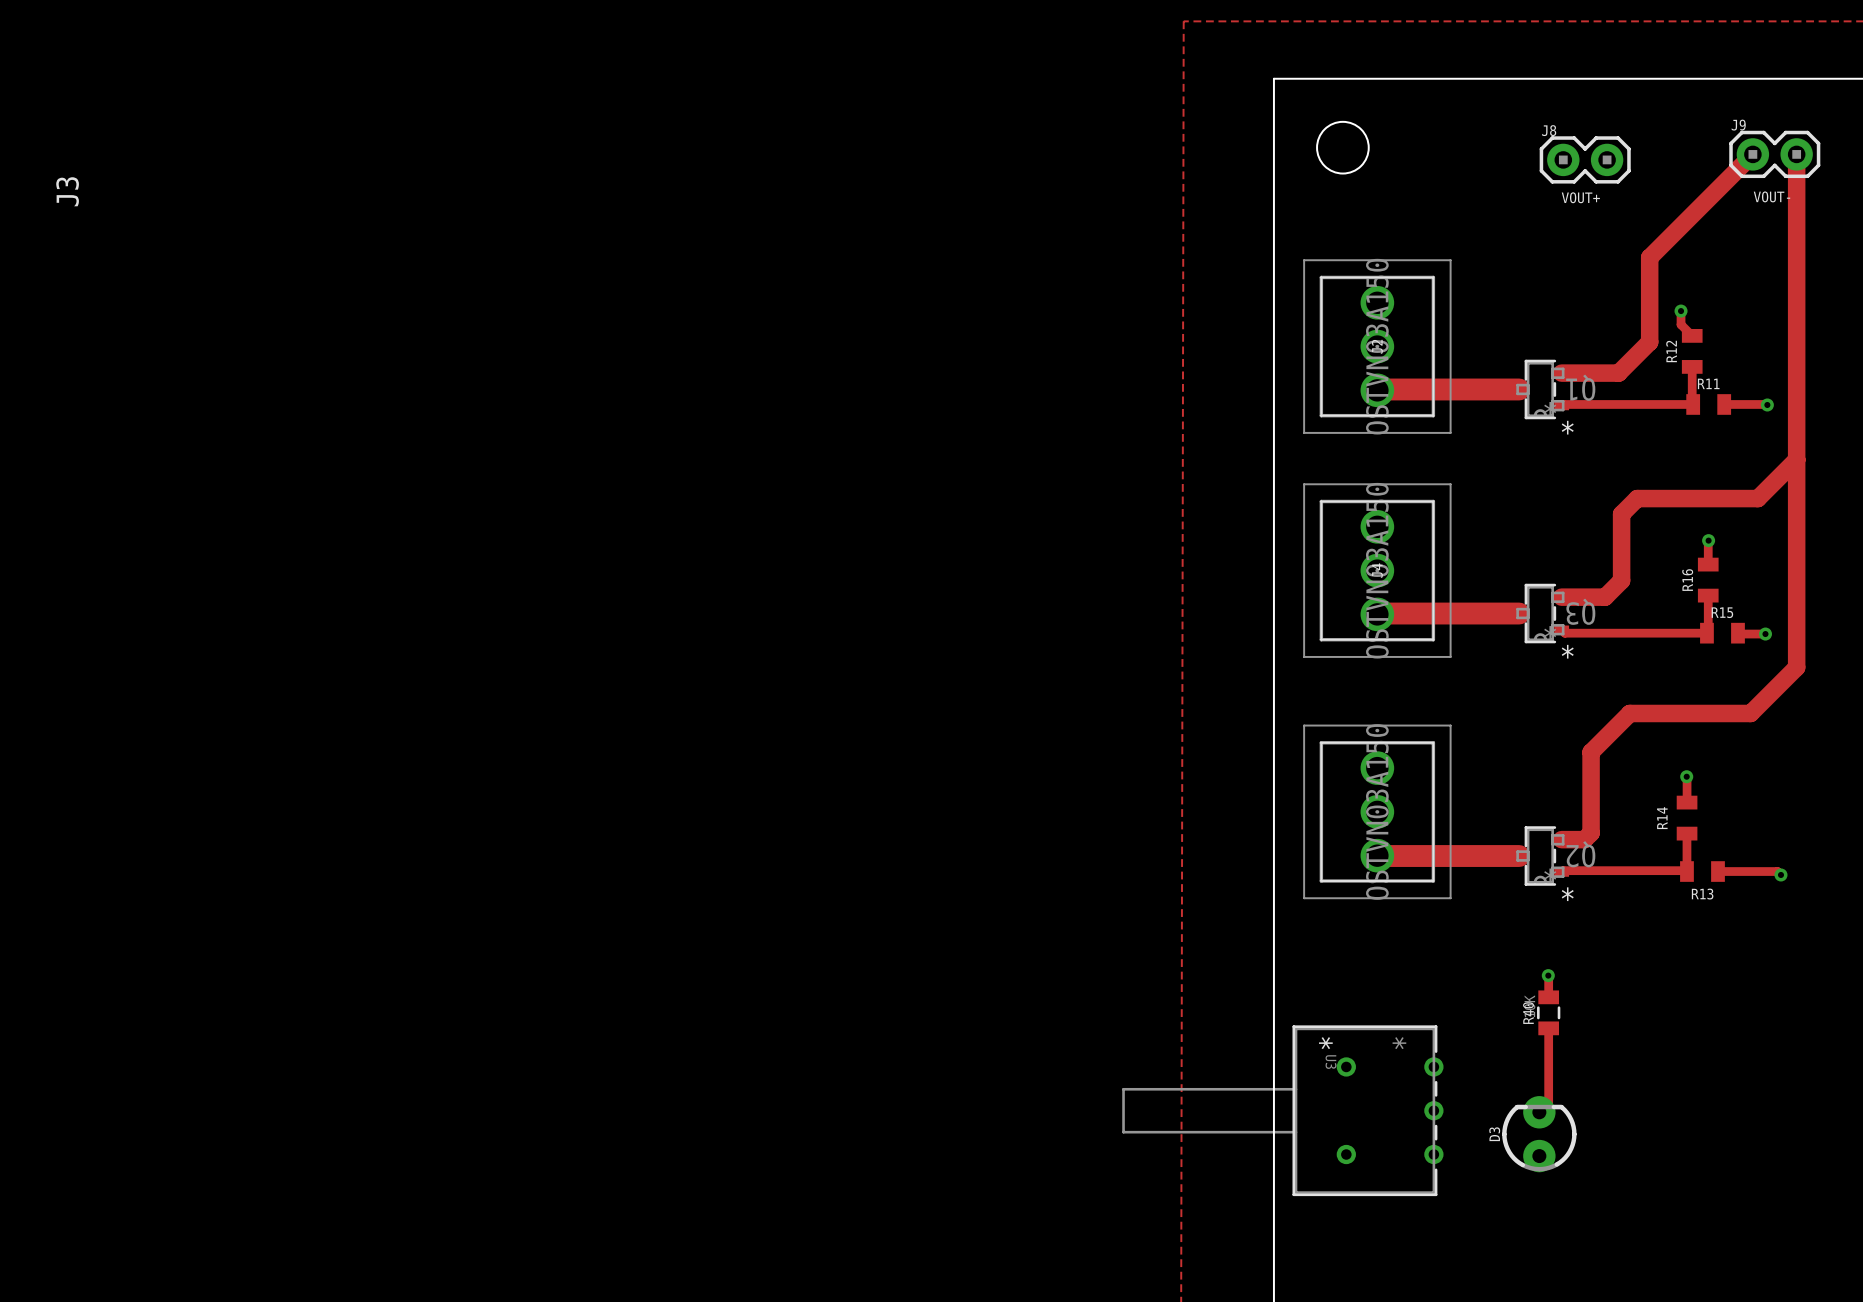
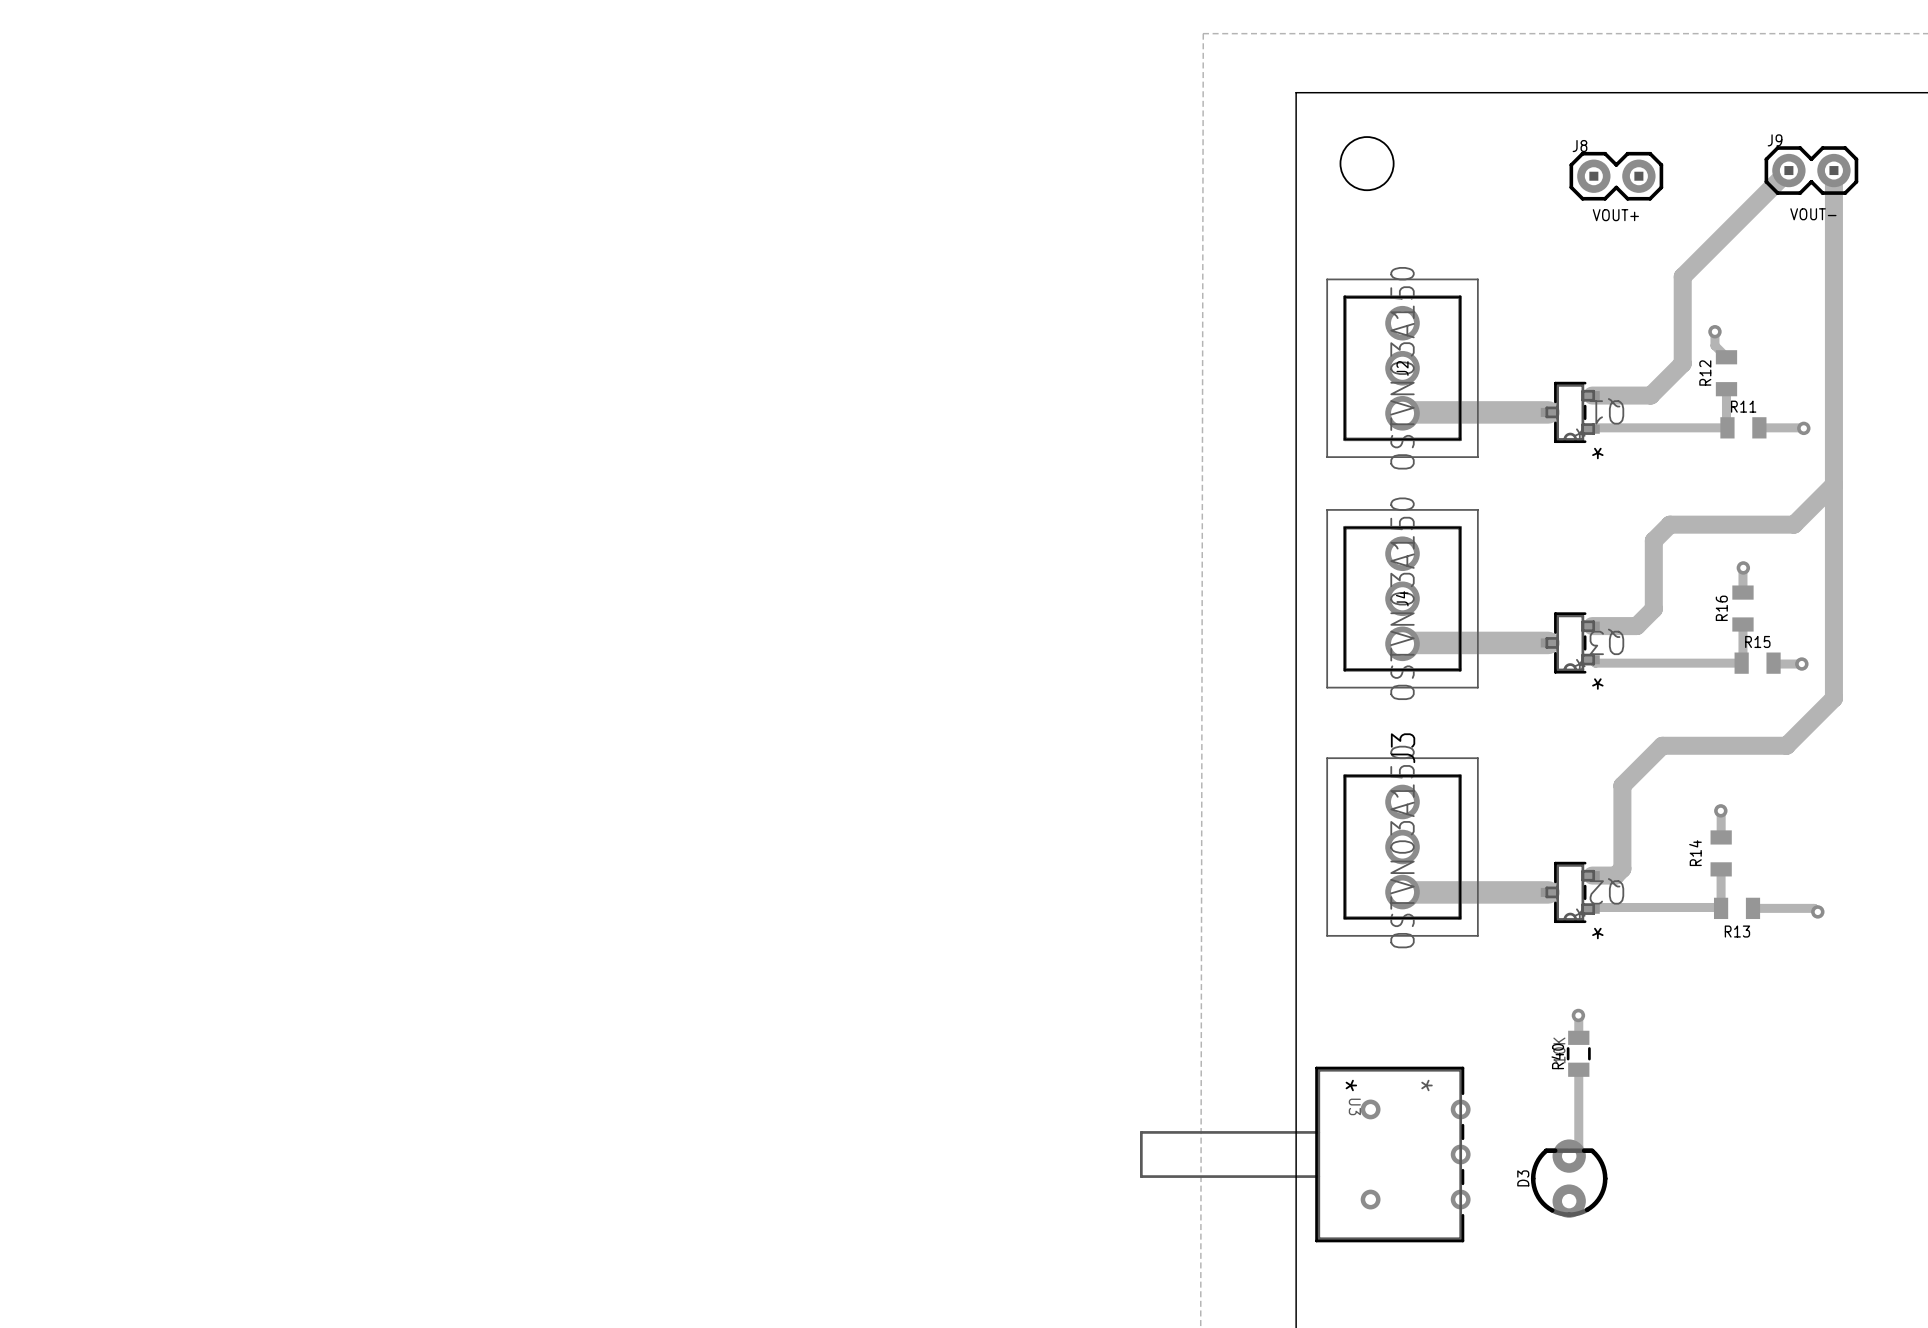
J3 name position: J3 (67, 191) -> J3 (1403, 748)

